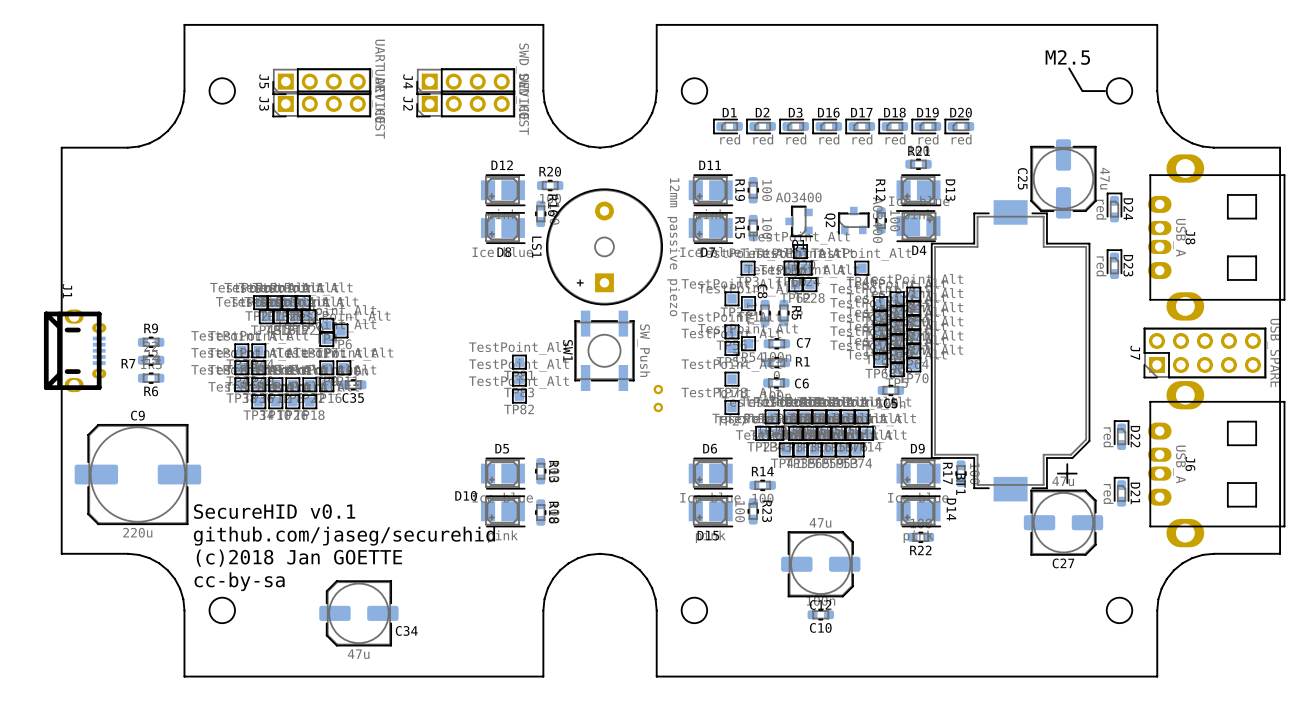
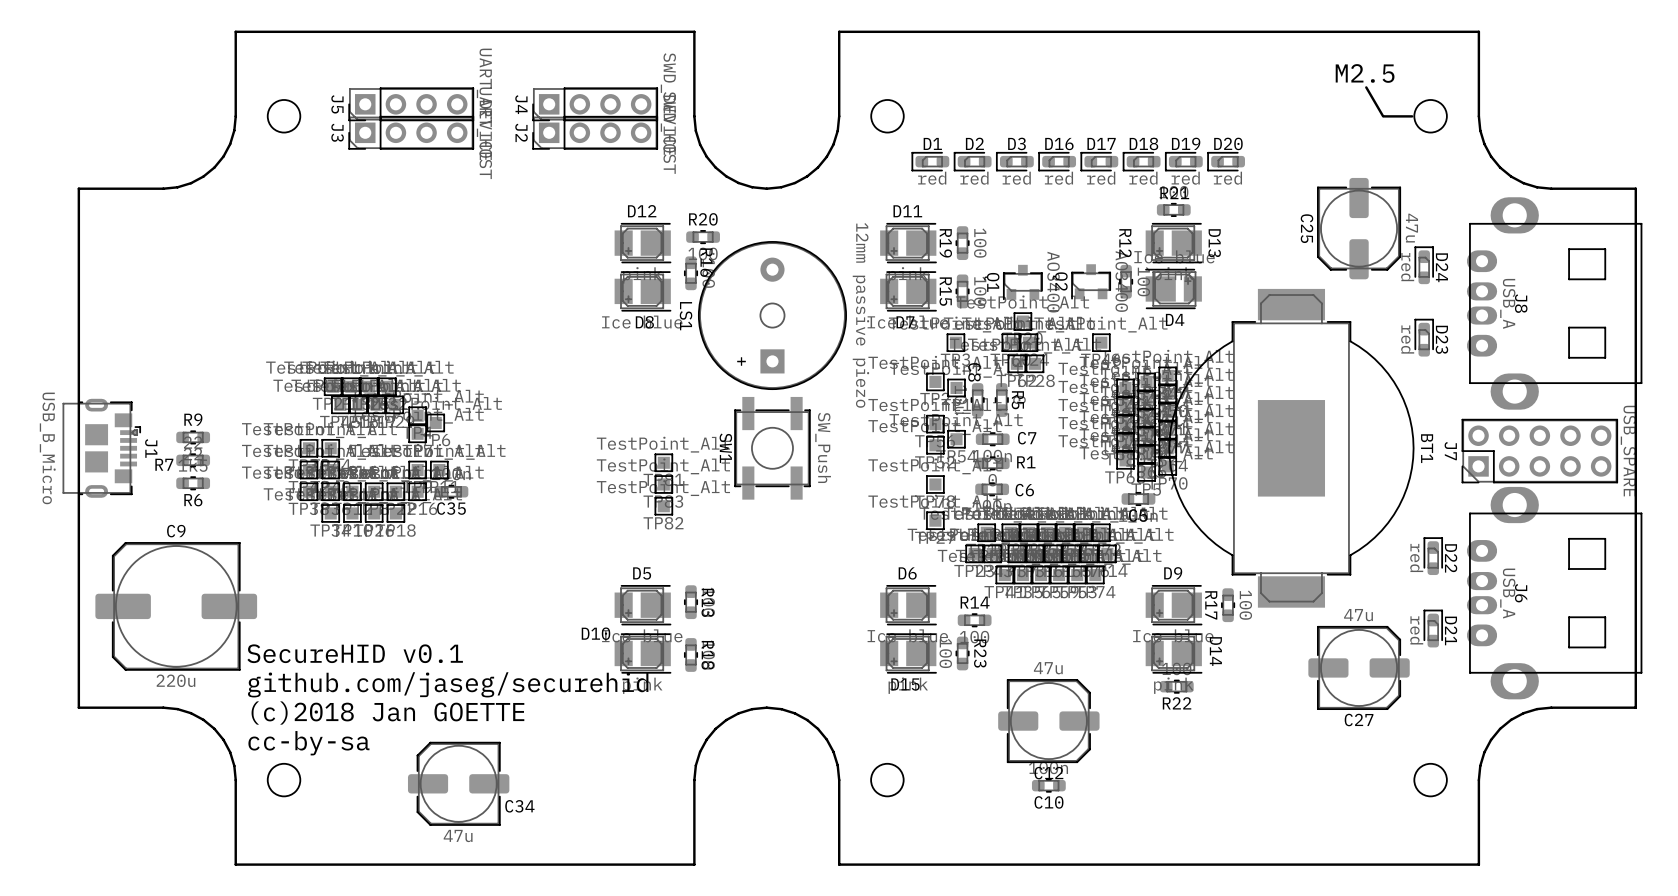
BT1 footprint: [931, 200, 1091, 502] -> [1168, 288, 1415, 608]
Q1 rotation: 0° (799, 221) -> 90° clockwise (1022, 282)
J1 name position: J1 (67, 291) -> J1 (151, 448)
J1 footprint: [43, 309, 107, 393] -> [62, 398, 141, 498]
J1 value: none -> USB_B_Micro (47, 448)
part: (658, 398) -> none
BT1 name position: BT1 (960, 484) -> BT1 (1427, 448)

